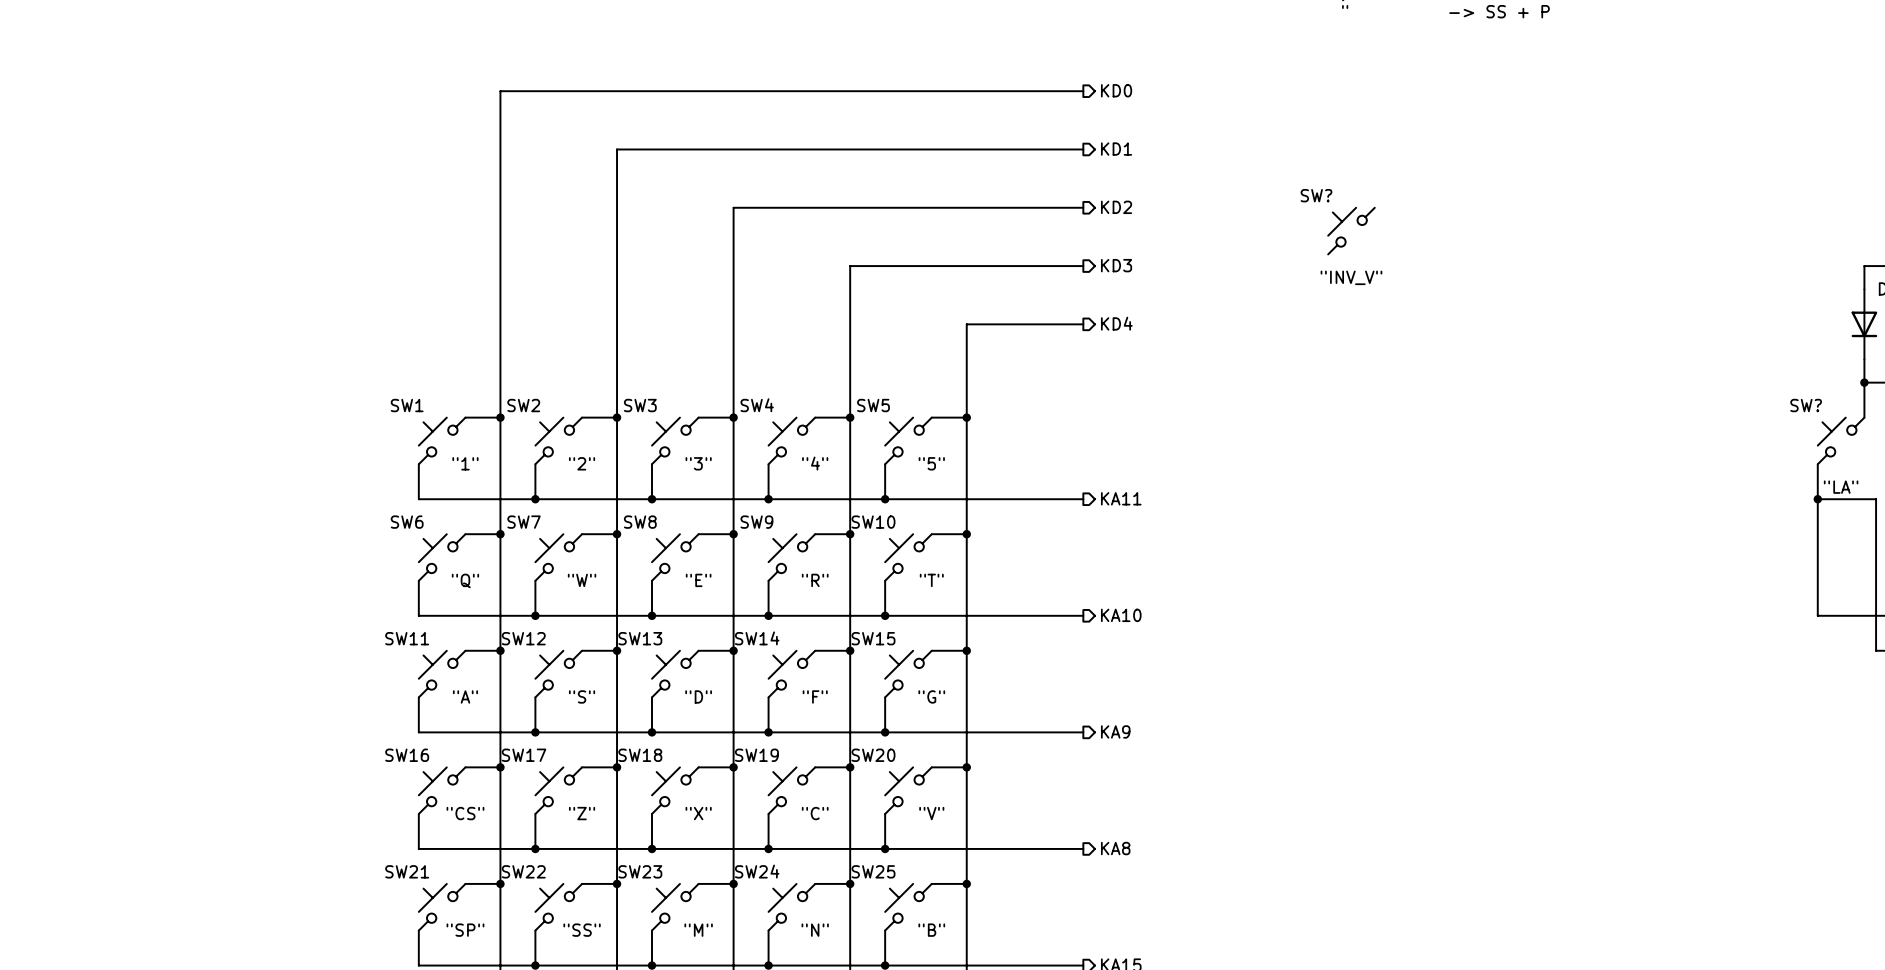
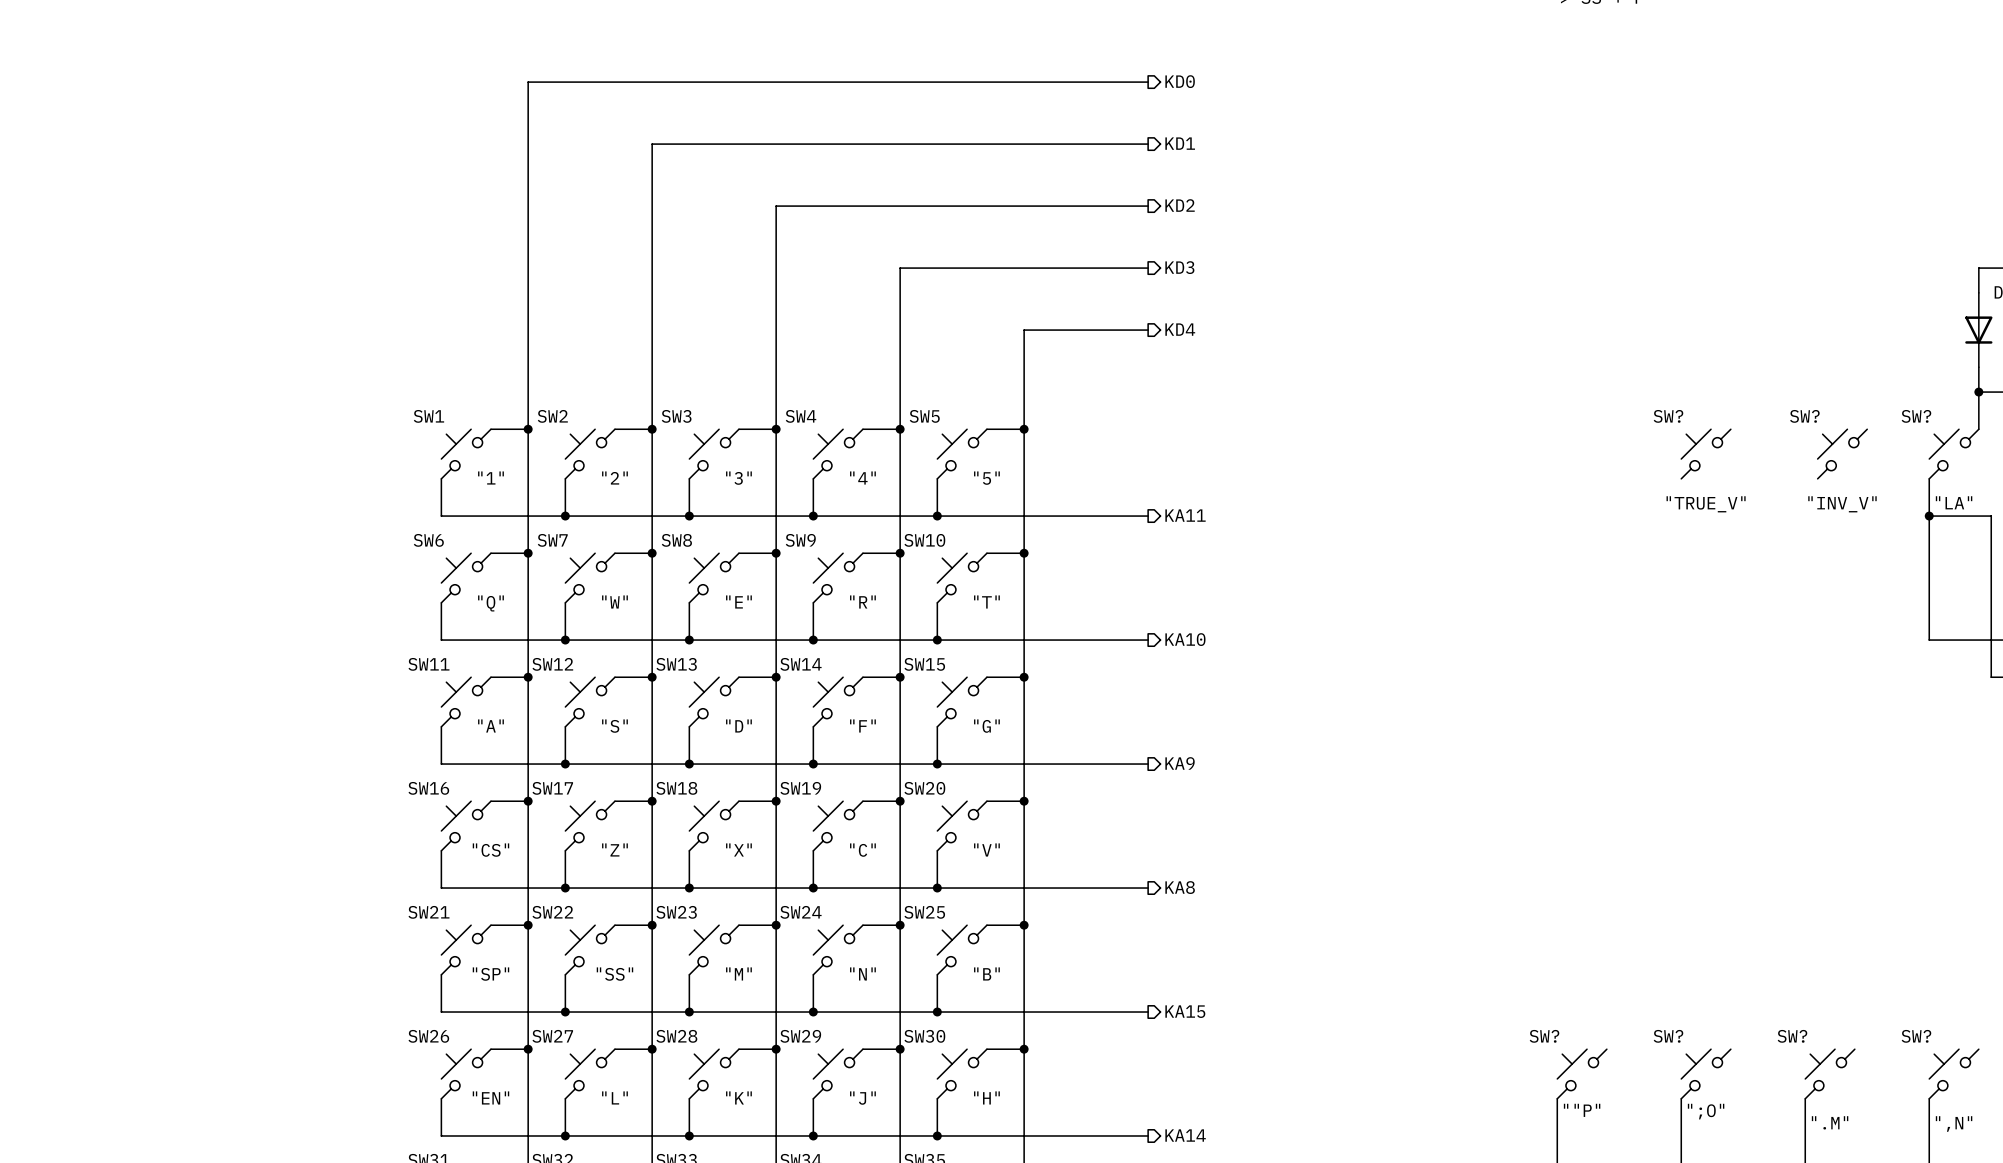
SW?: "INV_V" (1351, 231) -> none
SW?: none -> "TRUE_V" (1706, 454)
SW?: none -> "INV_V" (1842, 454)

